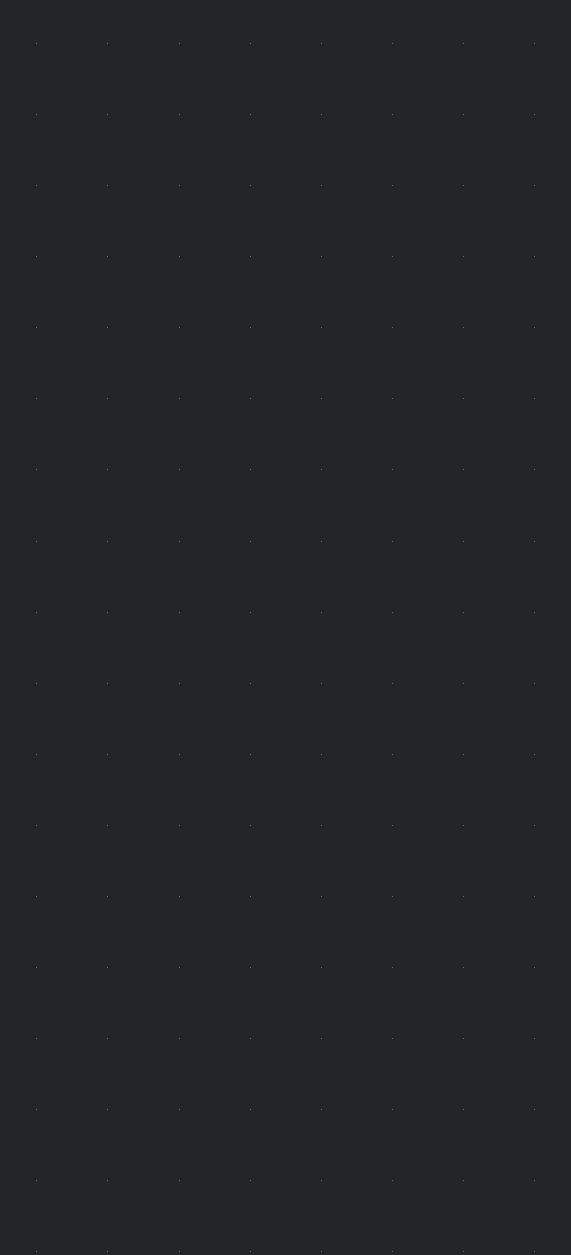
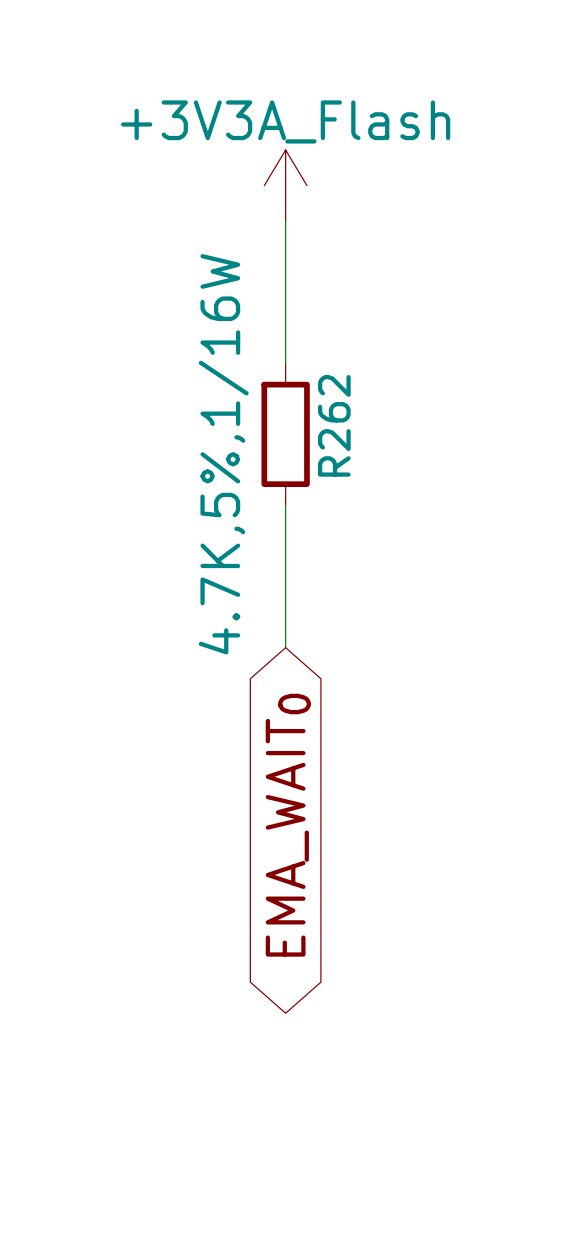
power symbol: none -> +3V3A_Flash (285, 185)
wire: none -> (285, 221) (285, 363)
R262: none -> 4.7K,5%,1/16W (285, 434)
wire: none -> (285, 505) (285, 647)
global label: none -> EMA_WAIT0 (288, 825)

